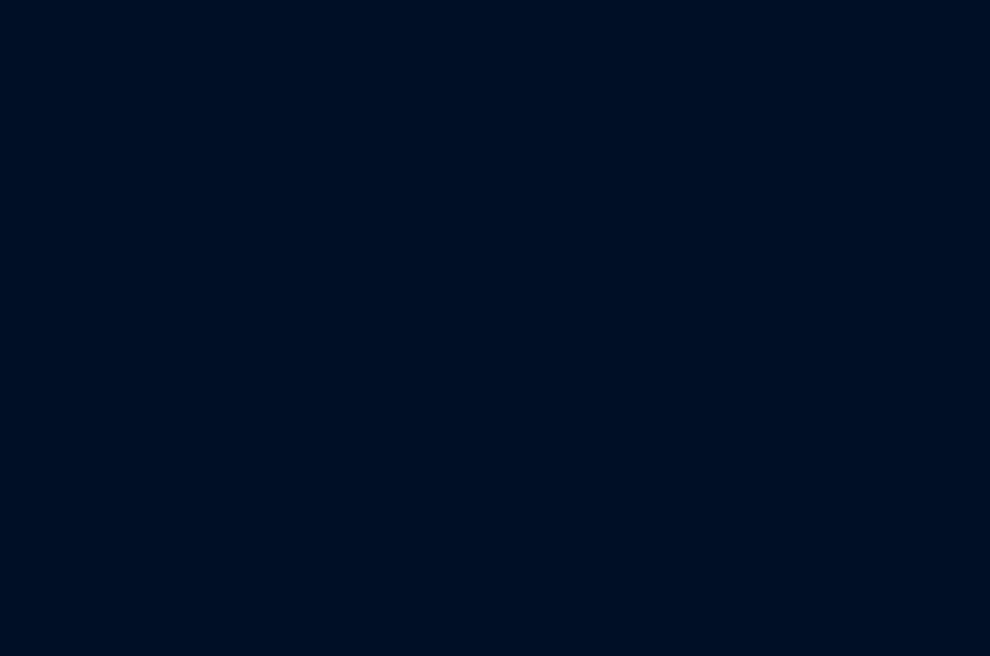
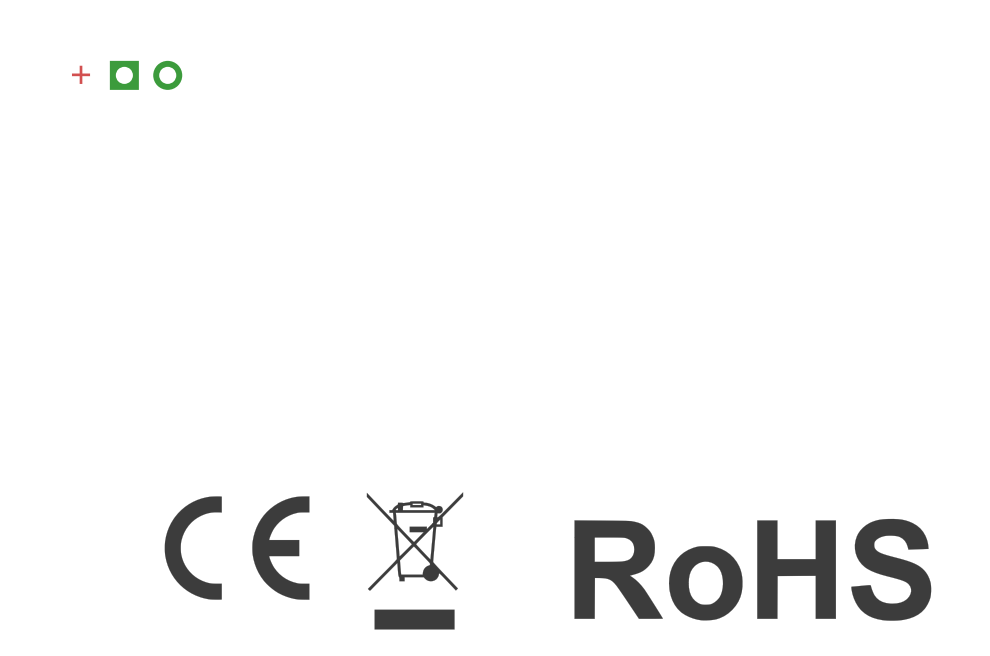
part: none -> (146, 75)
text: none -> + (81, 74)
drawing: none -> [366, 492, 464, 630]
drawing: none -> [164, 496, 310, 600]
drawing: none -> [574, 518, 932, 621]

